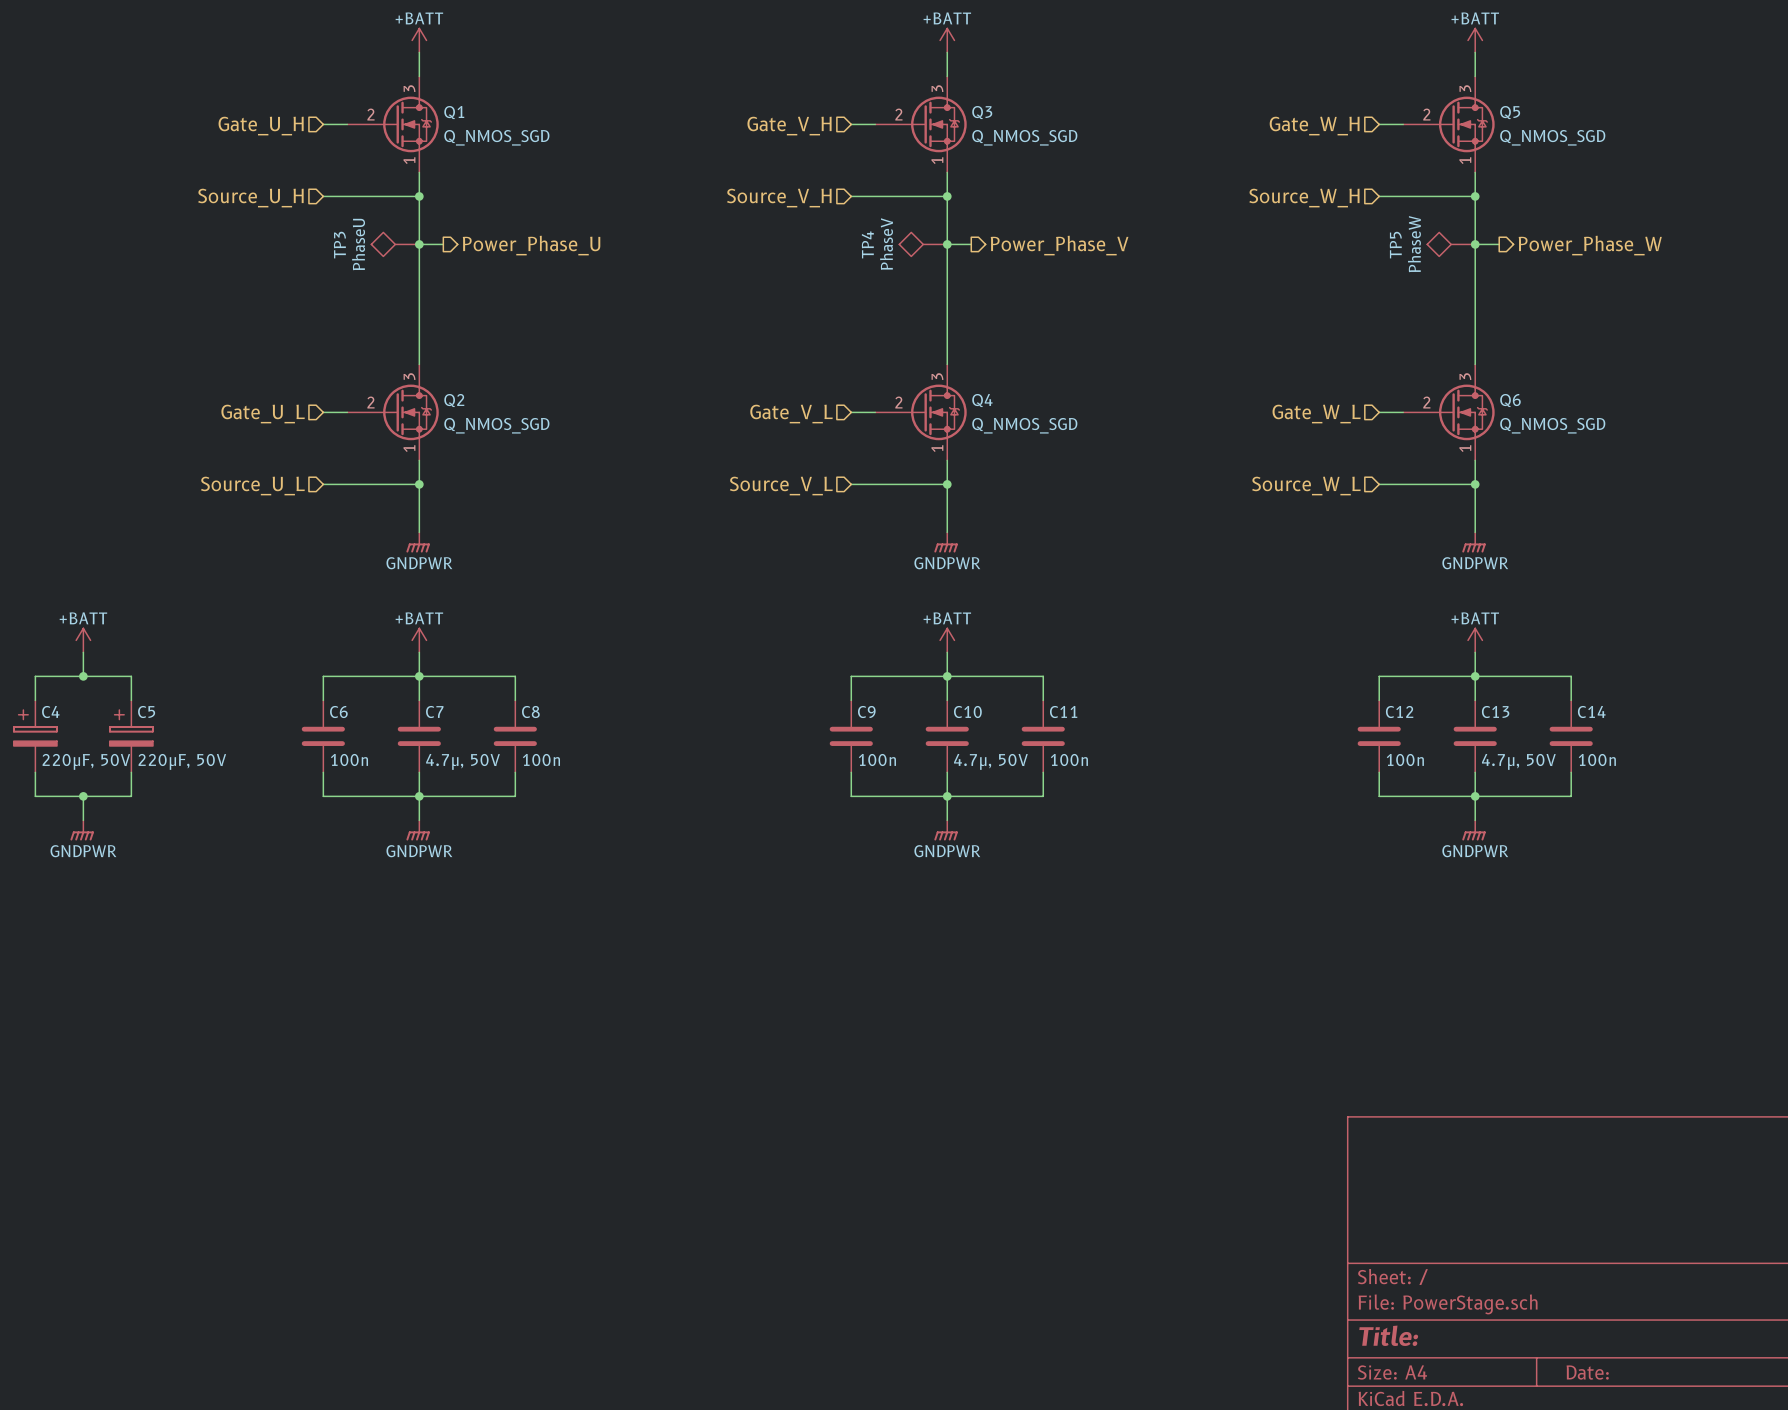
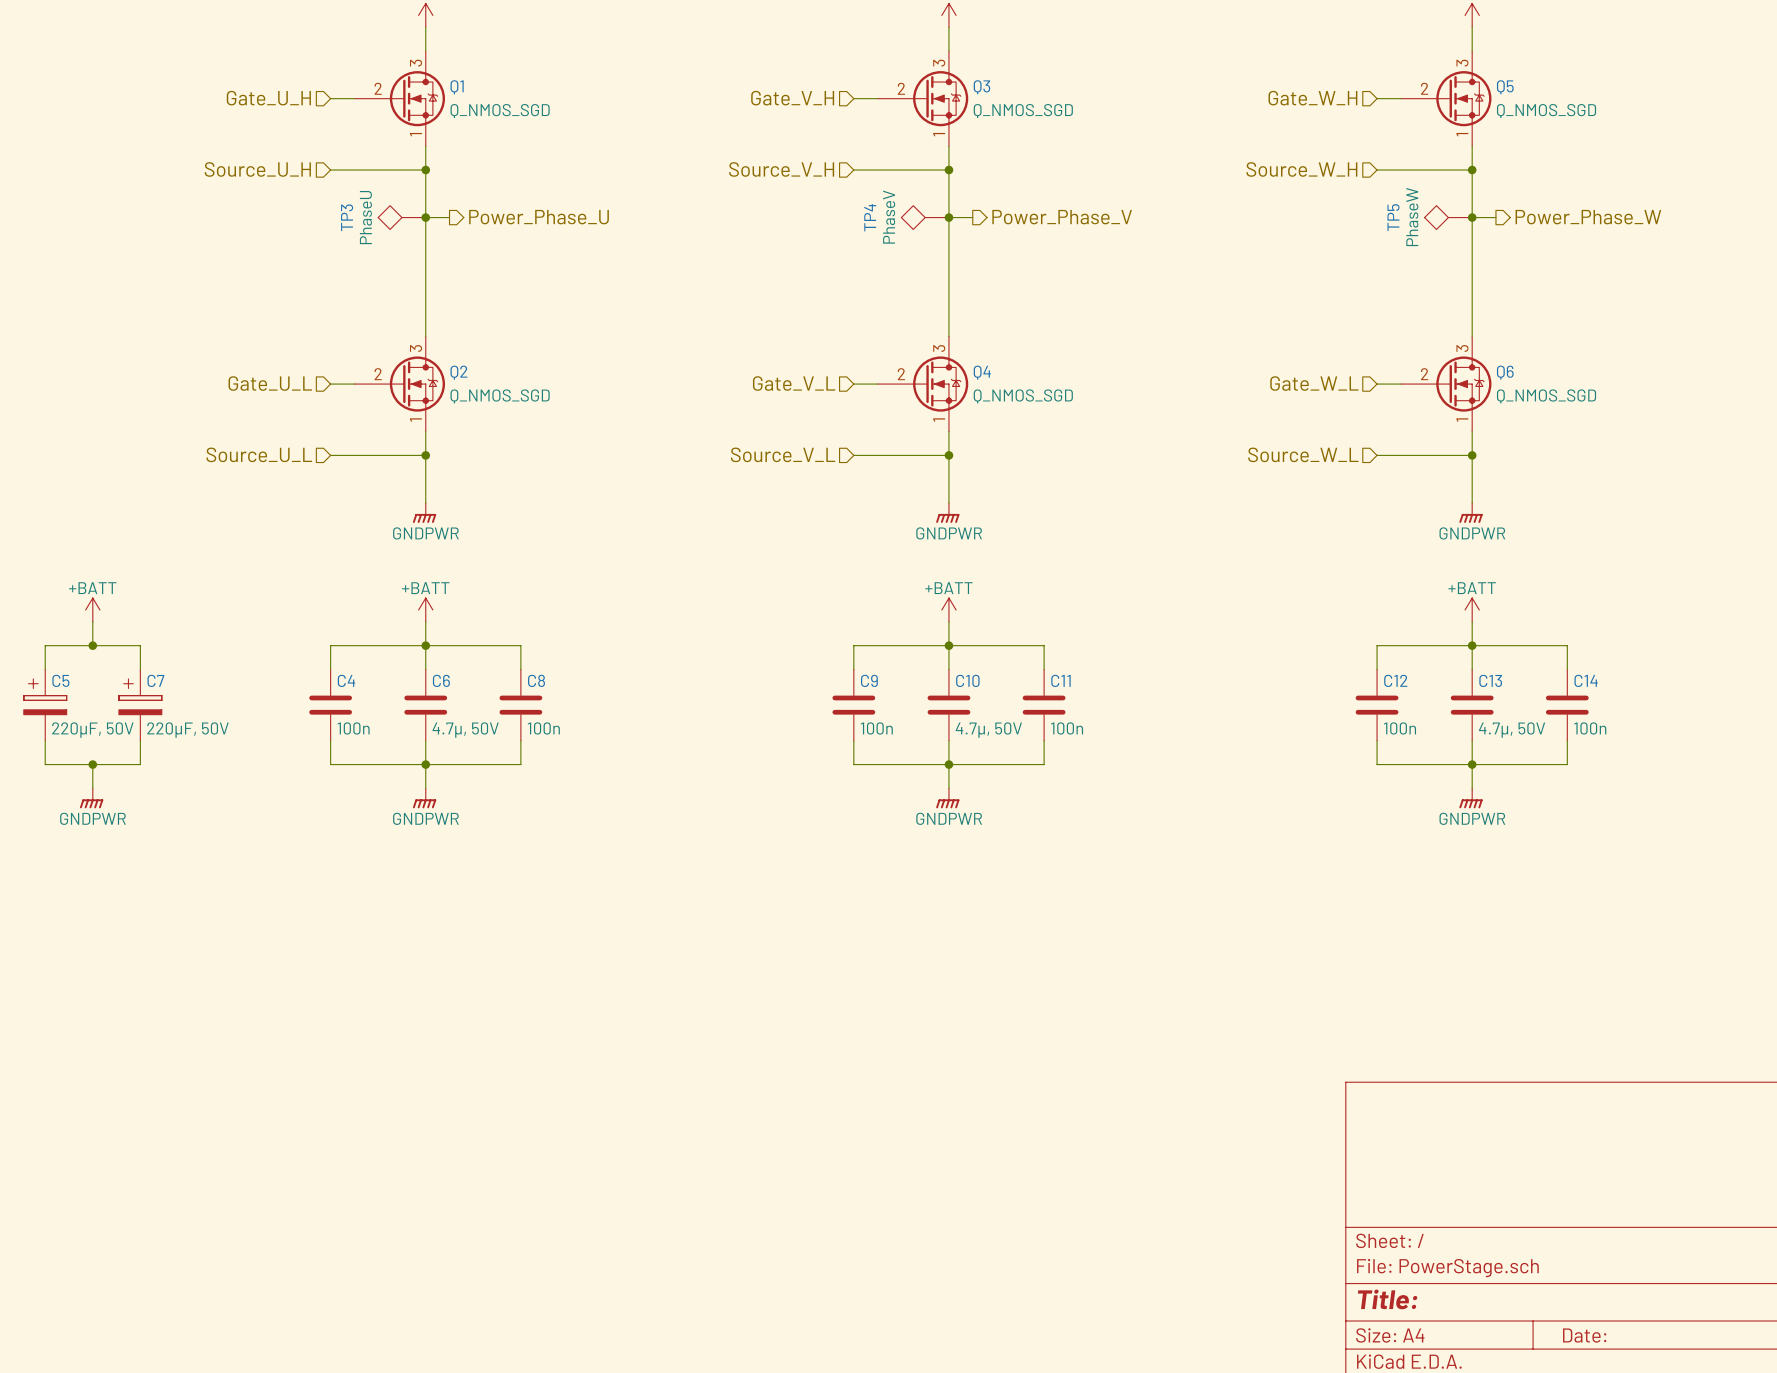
C4 name: C4 (50, 711) -> C5 (60, 680)
C5 name: C5 (146, 712) -> C7 (155, 680)
C6 name: C6 (338, 712) -> C4 (346, 680)
C7 name: C7 (434, 712) -> C6 (441, 680)

